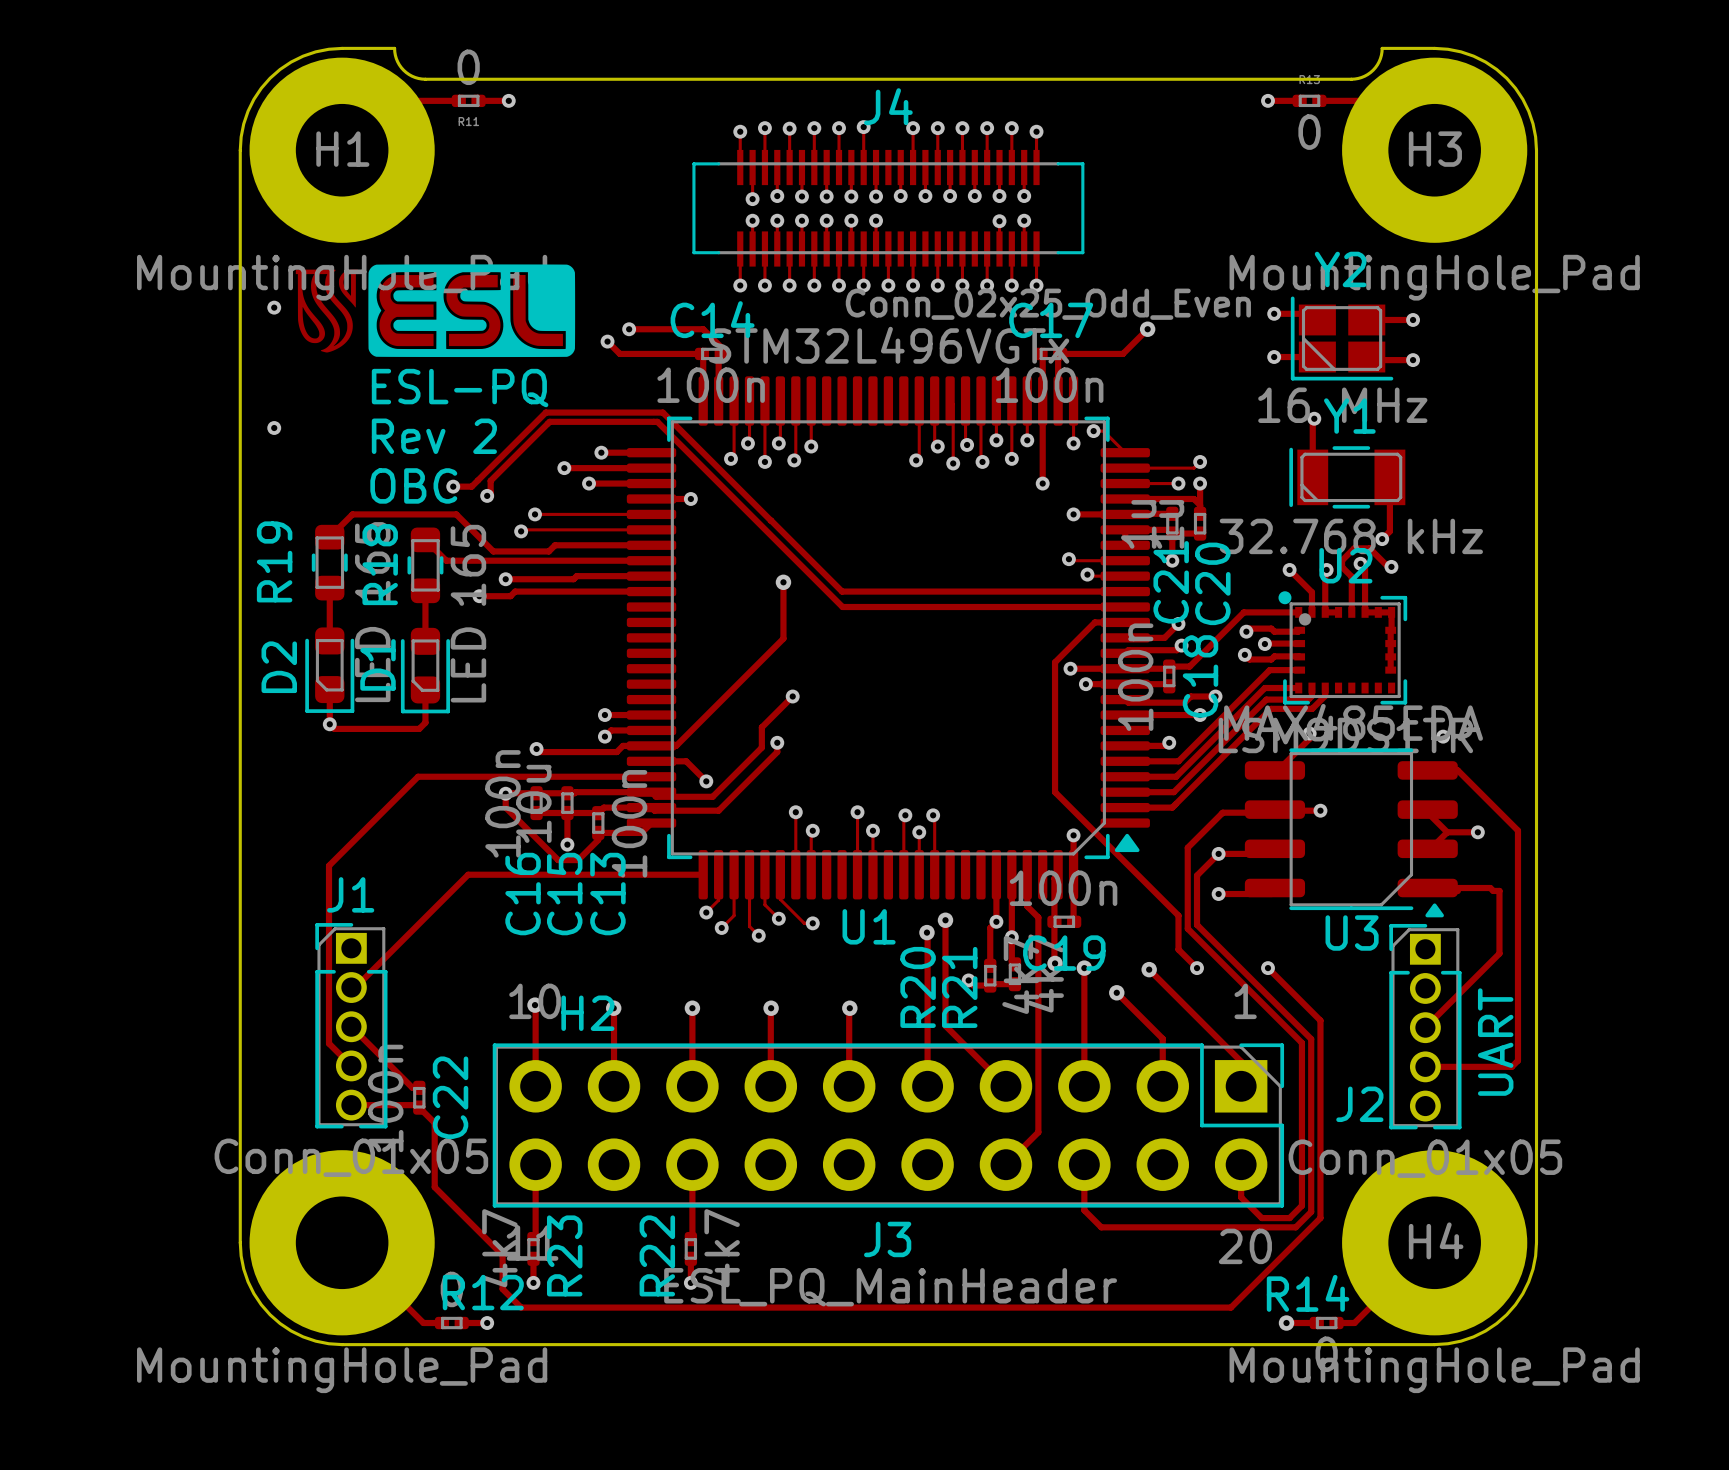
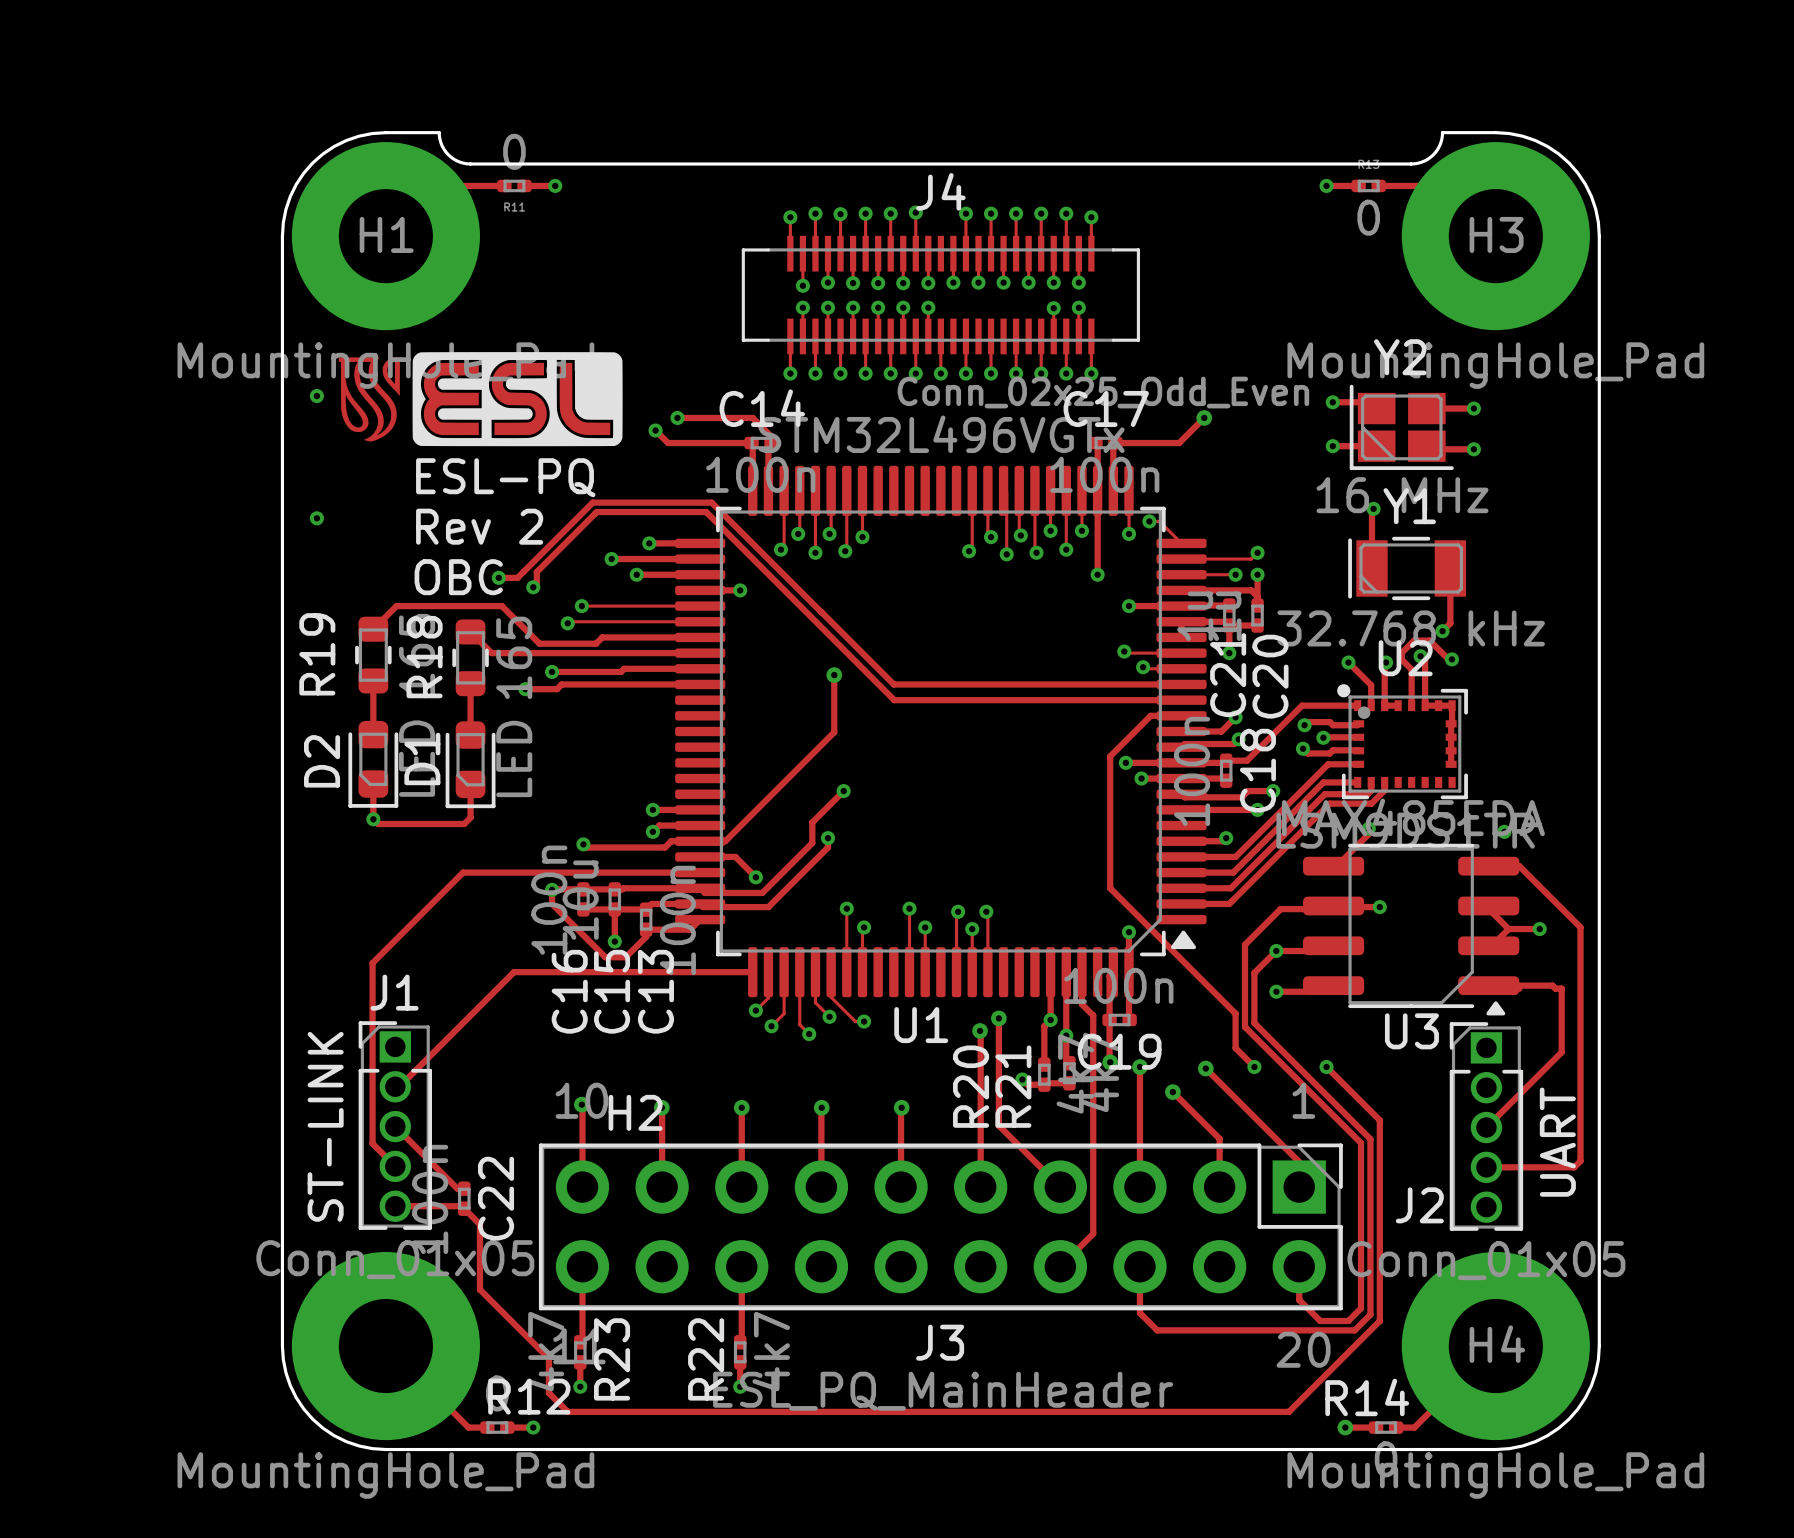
text: none -> ST-LINK (325, 1126)

